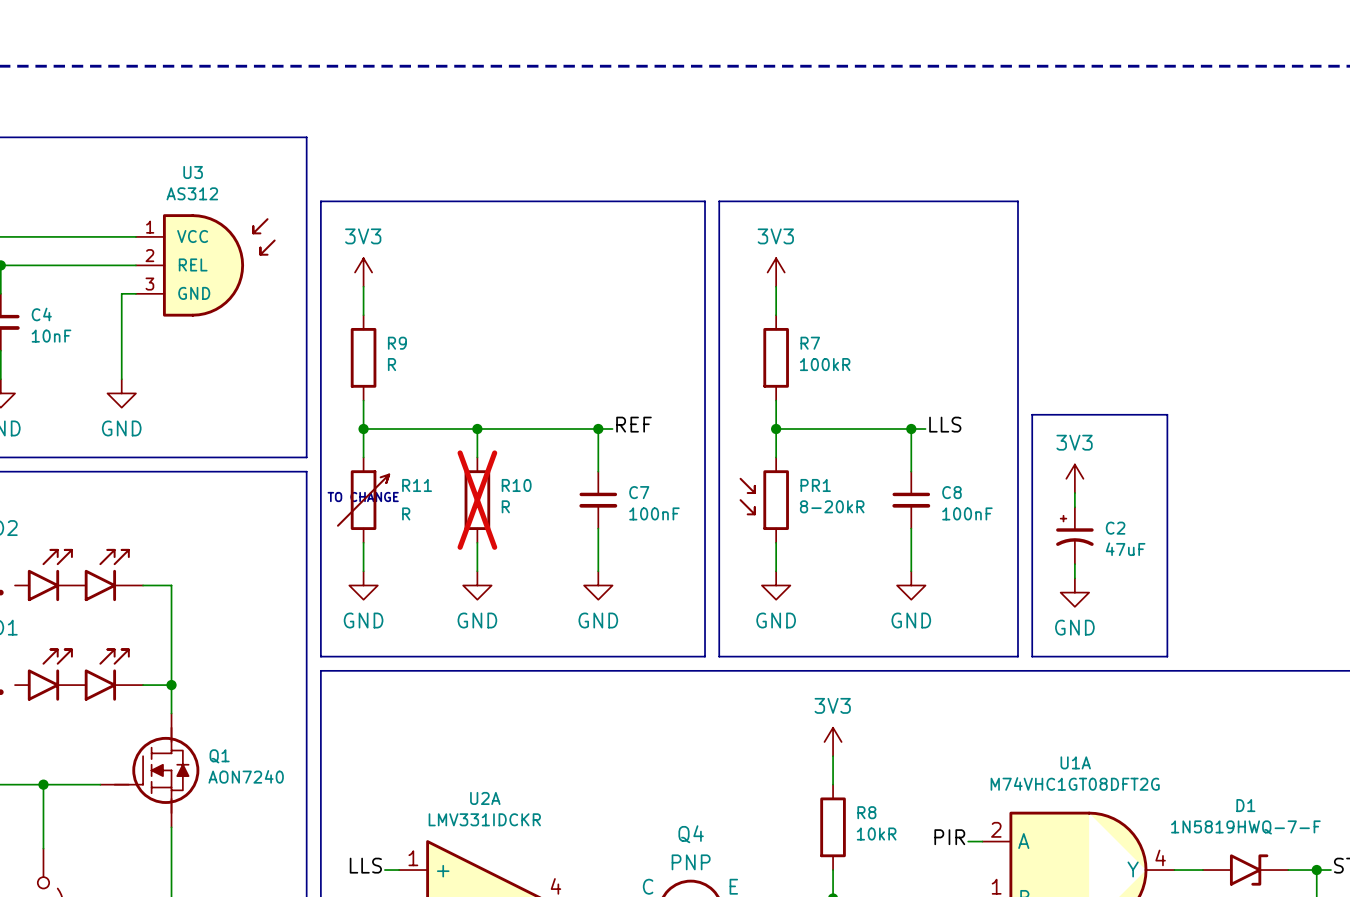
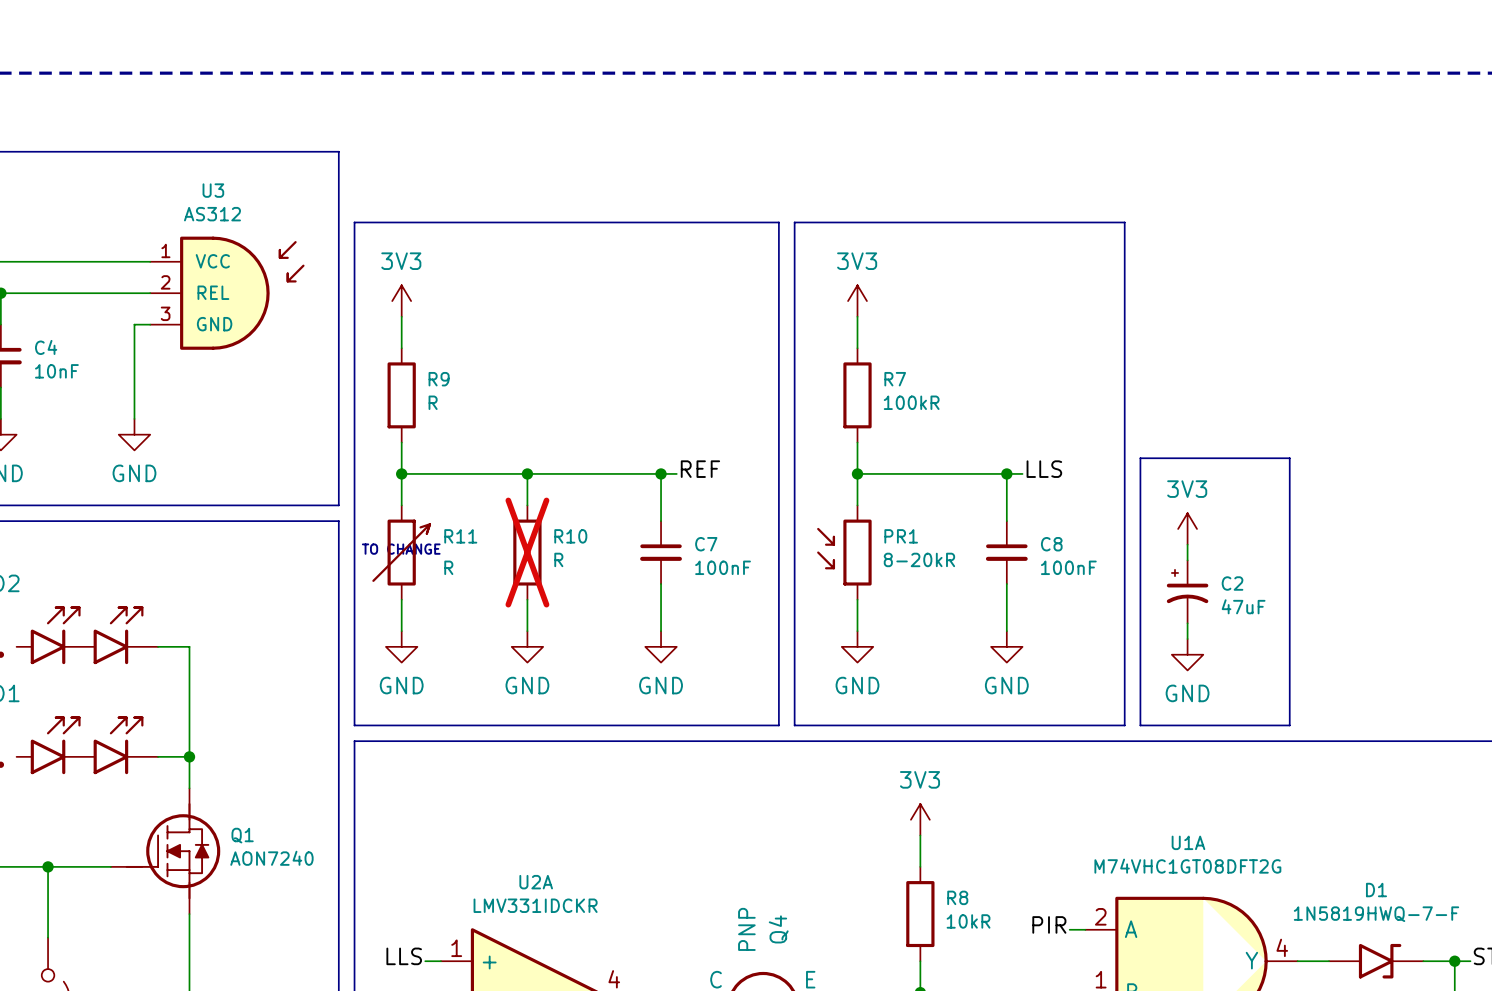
Q4 name rotation: 0° (691, 834) -> 90° counterclockwise (778, 929)
Q4 value rotation: 0° (691, 862) -> 90° counterclockwise (746, 929)

